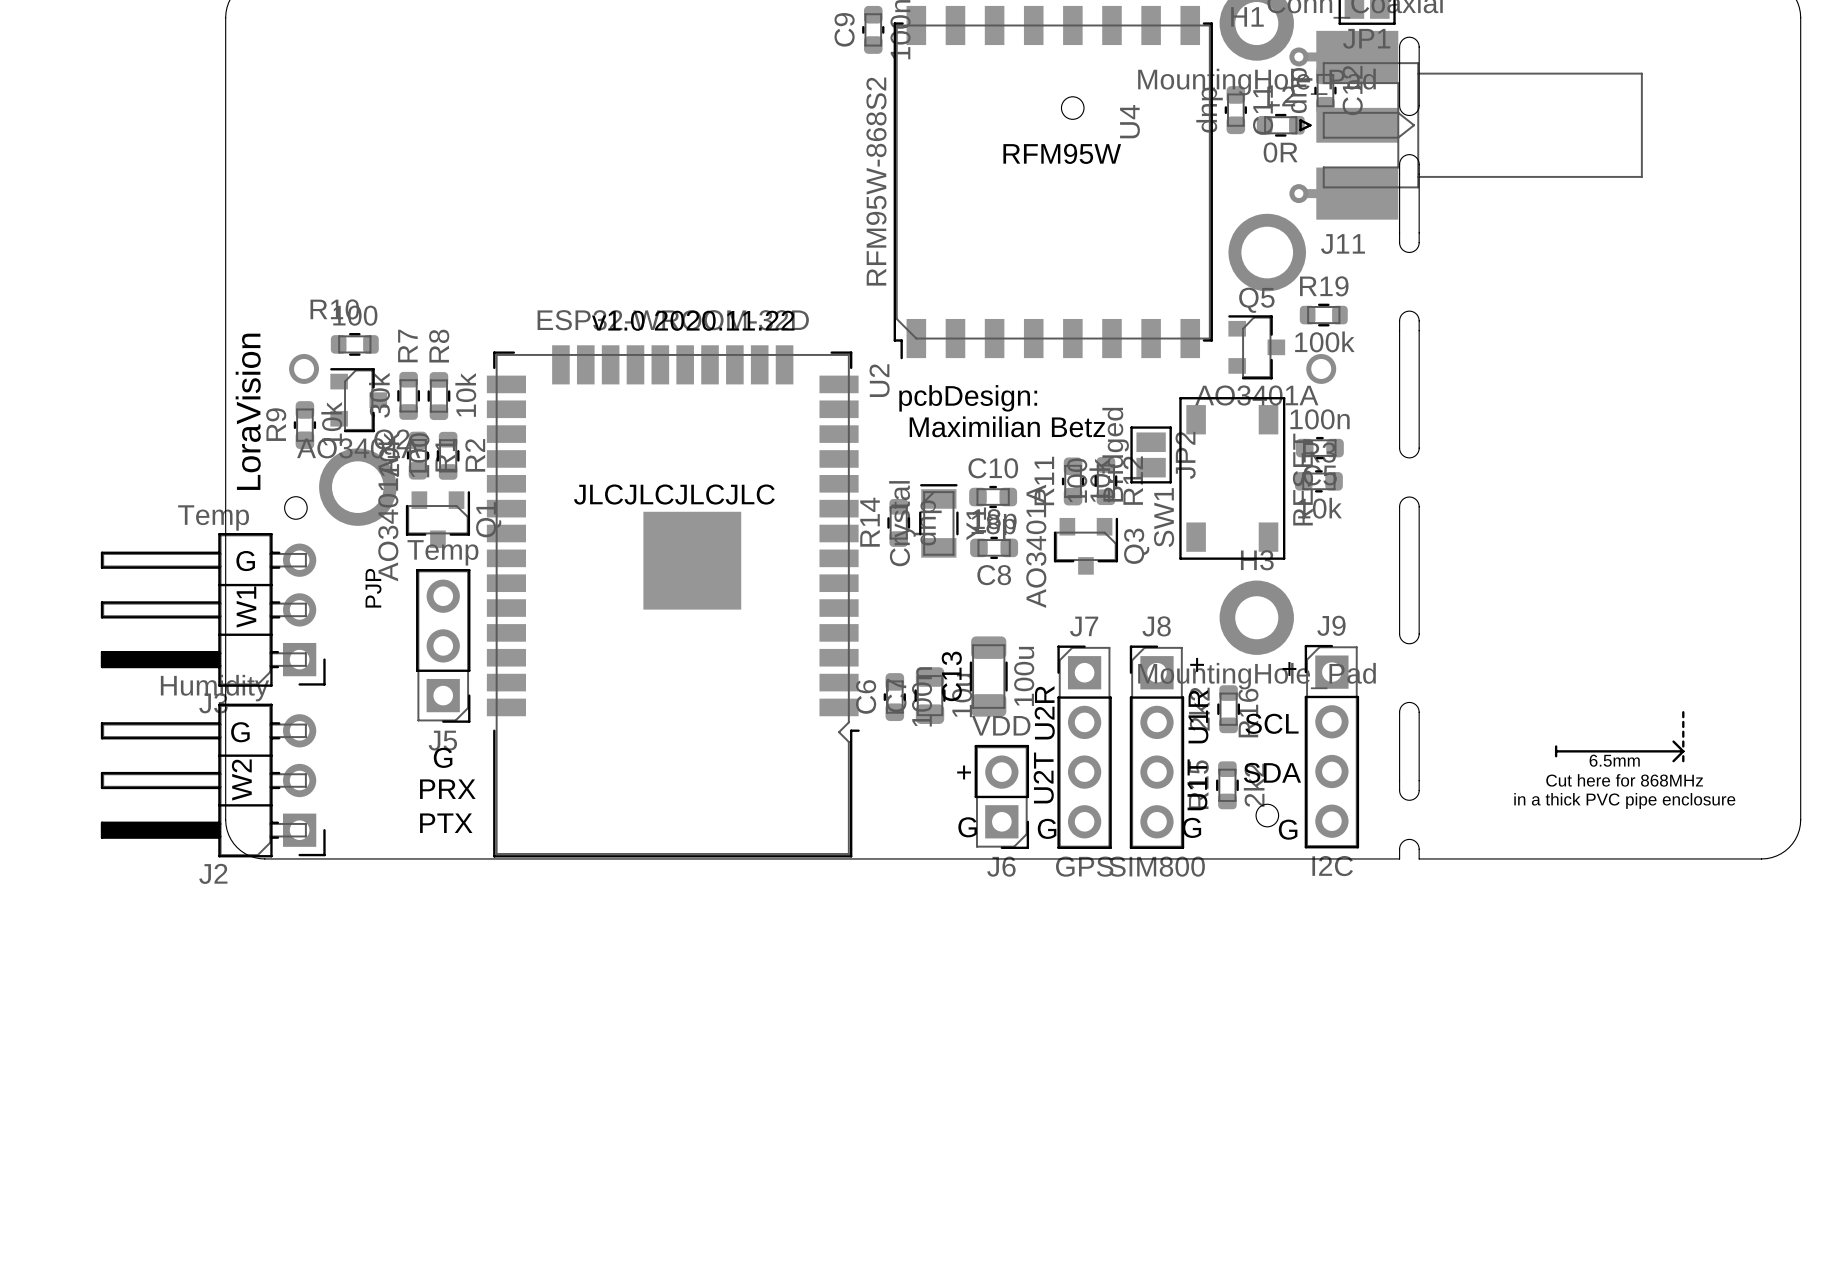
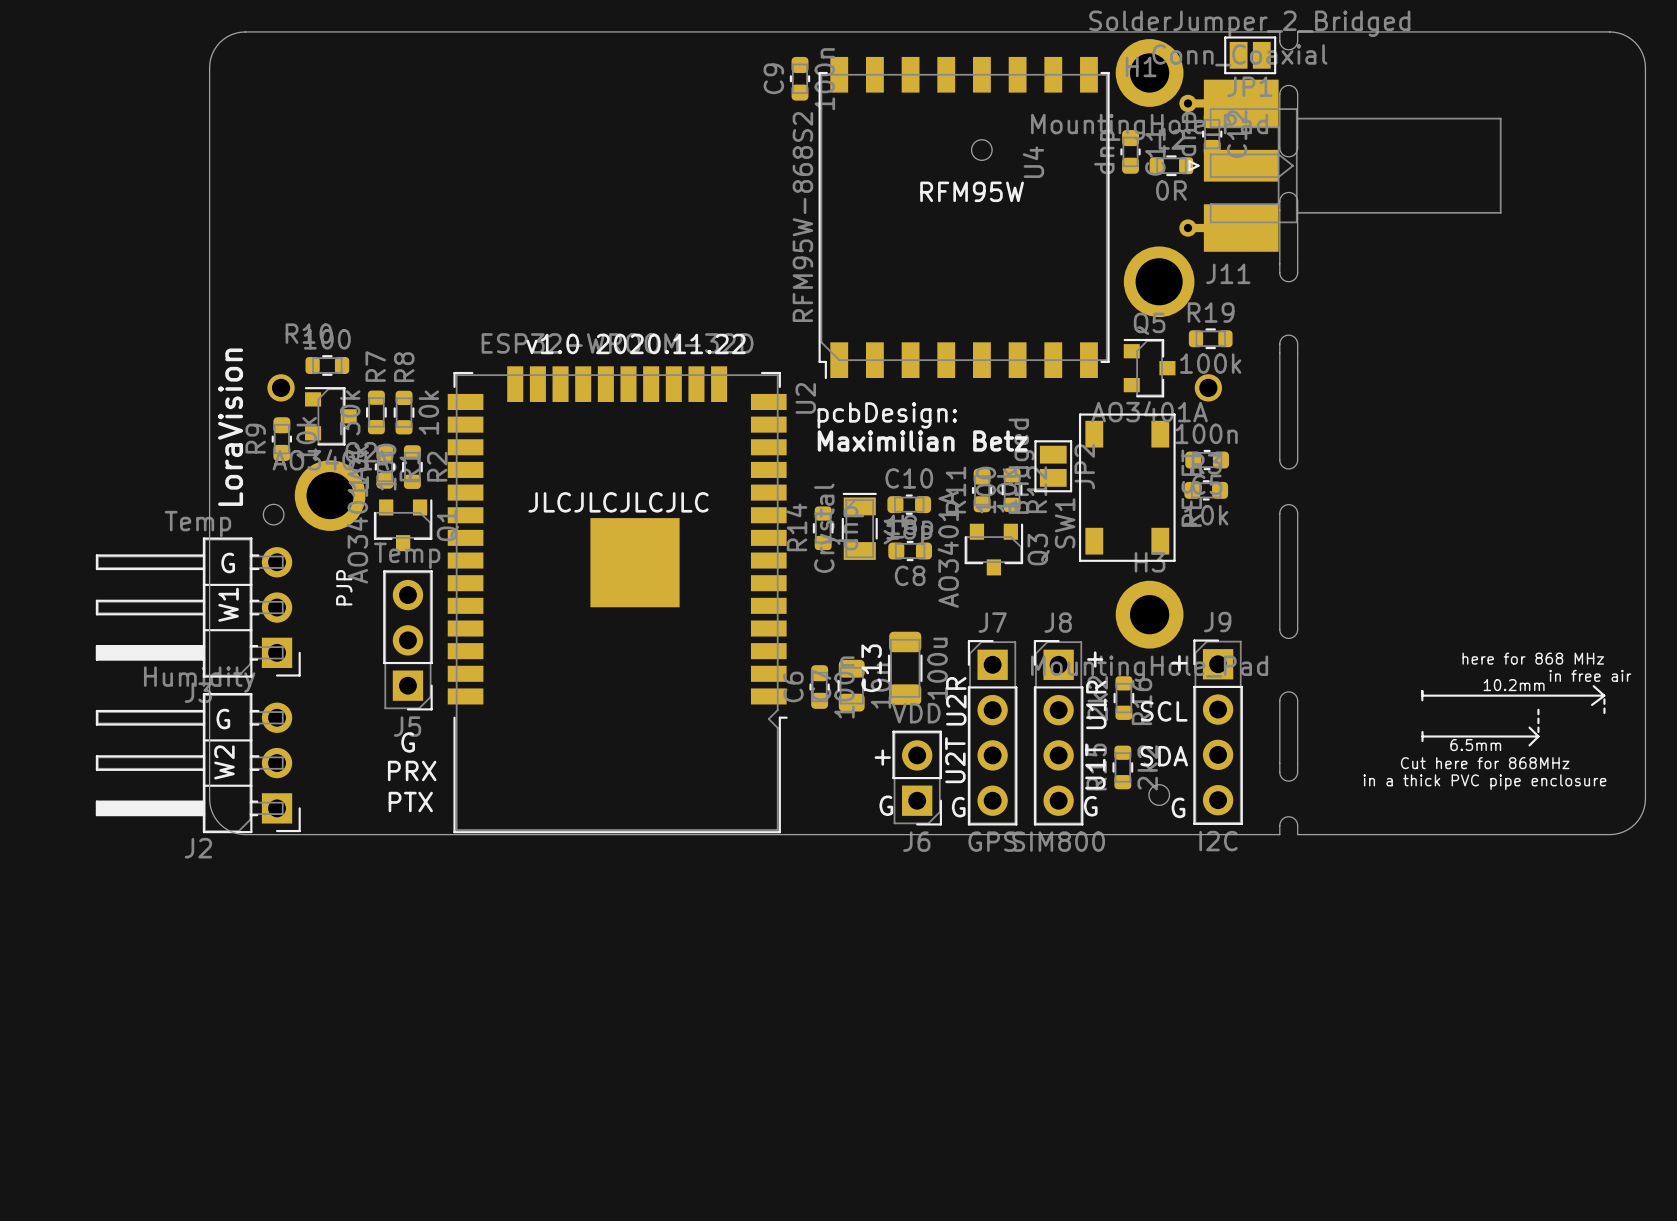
text: none -> here for 868 MHz (1533, 658)
text: none -> in free air (1590, 675)
text: none -> 10.2mm (1514, 685)
line: none -> (1593, 686) (1604, 695)
line: none -> (1422, 691) (1422, 700)
line: none -> (1422, 695) (1604, 695)
line: none -> (1604, 695) (1592, 704)
line: (1683, 712) (1683, 717) -> (1604, 699) (1604, 703)
line: (1683, 756) (1683, 761) -> (1604, 708) (1604, 712)

